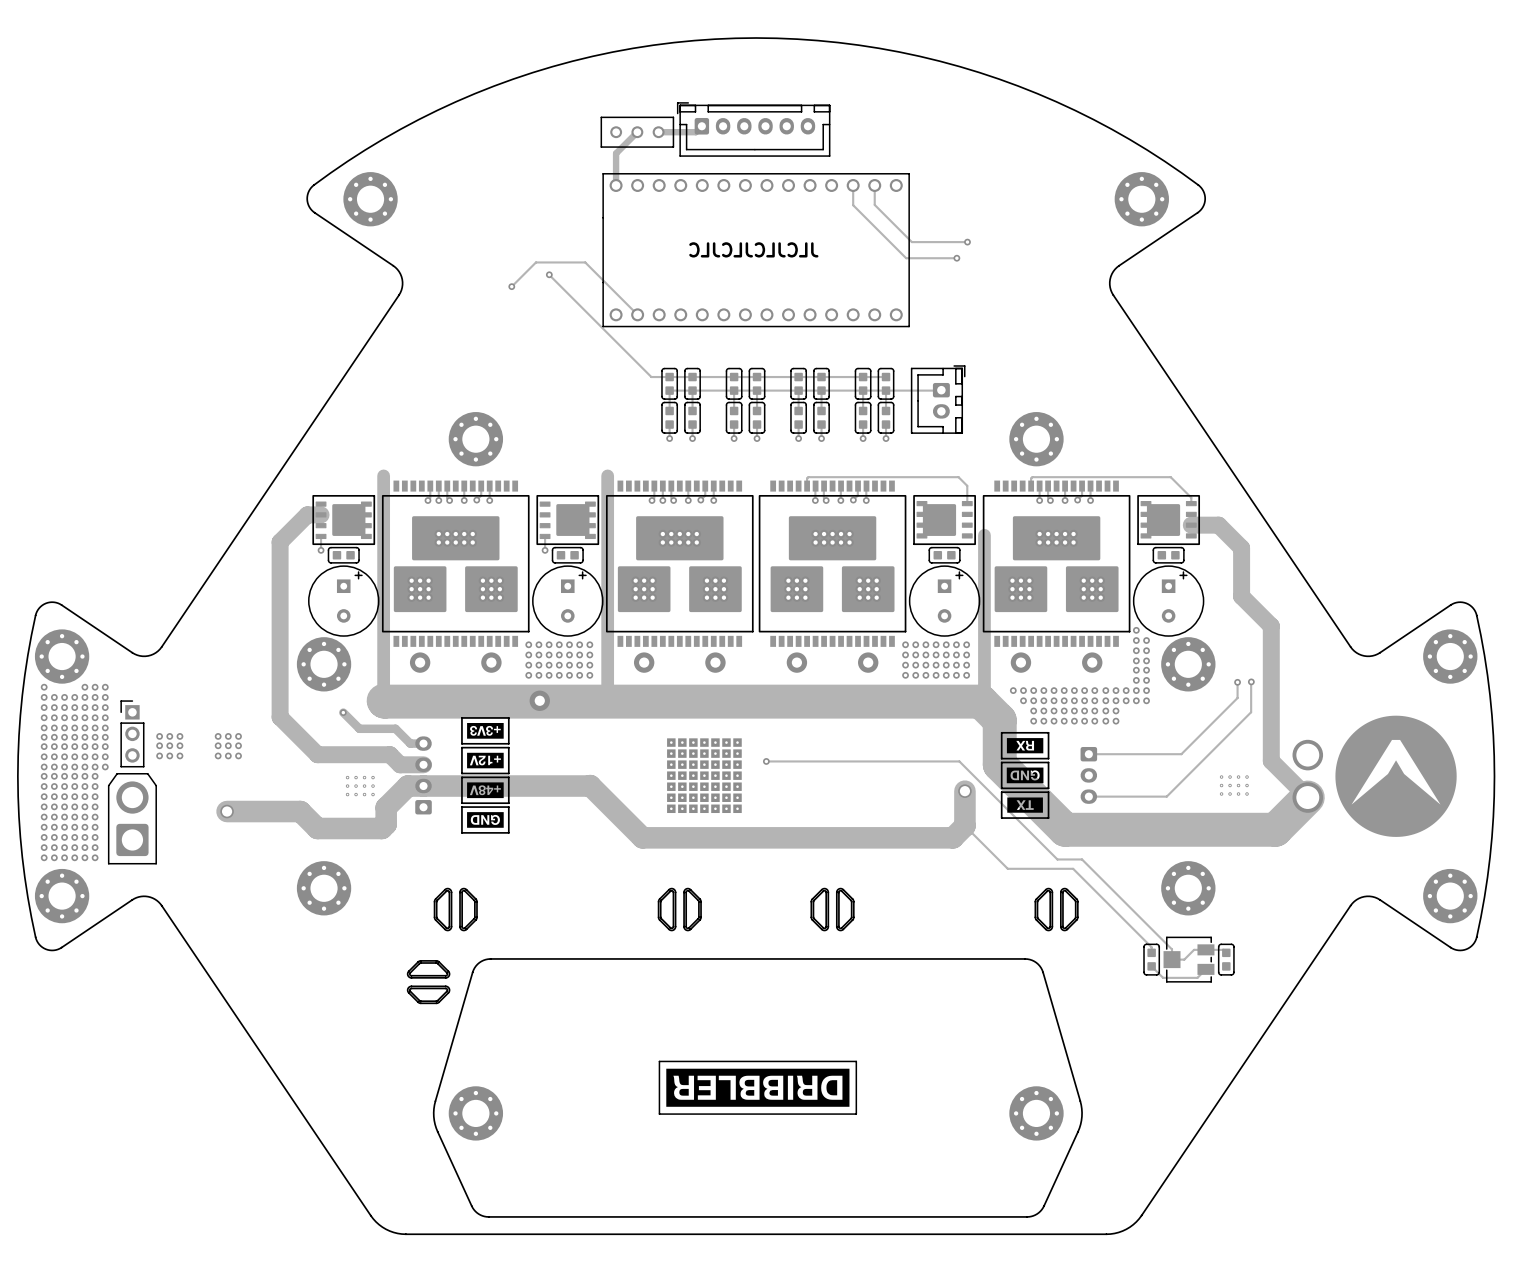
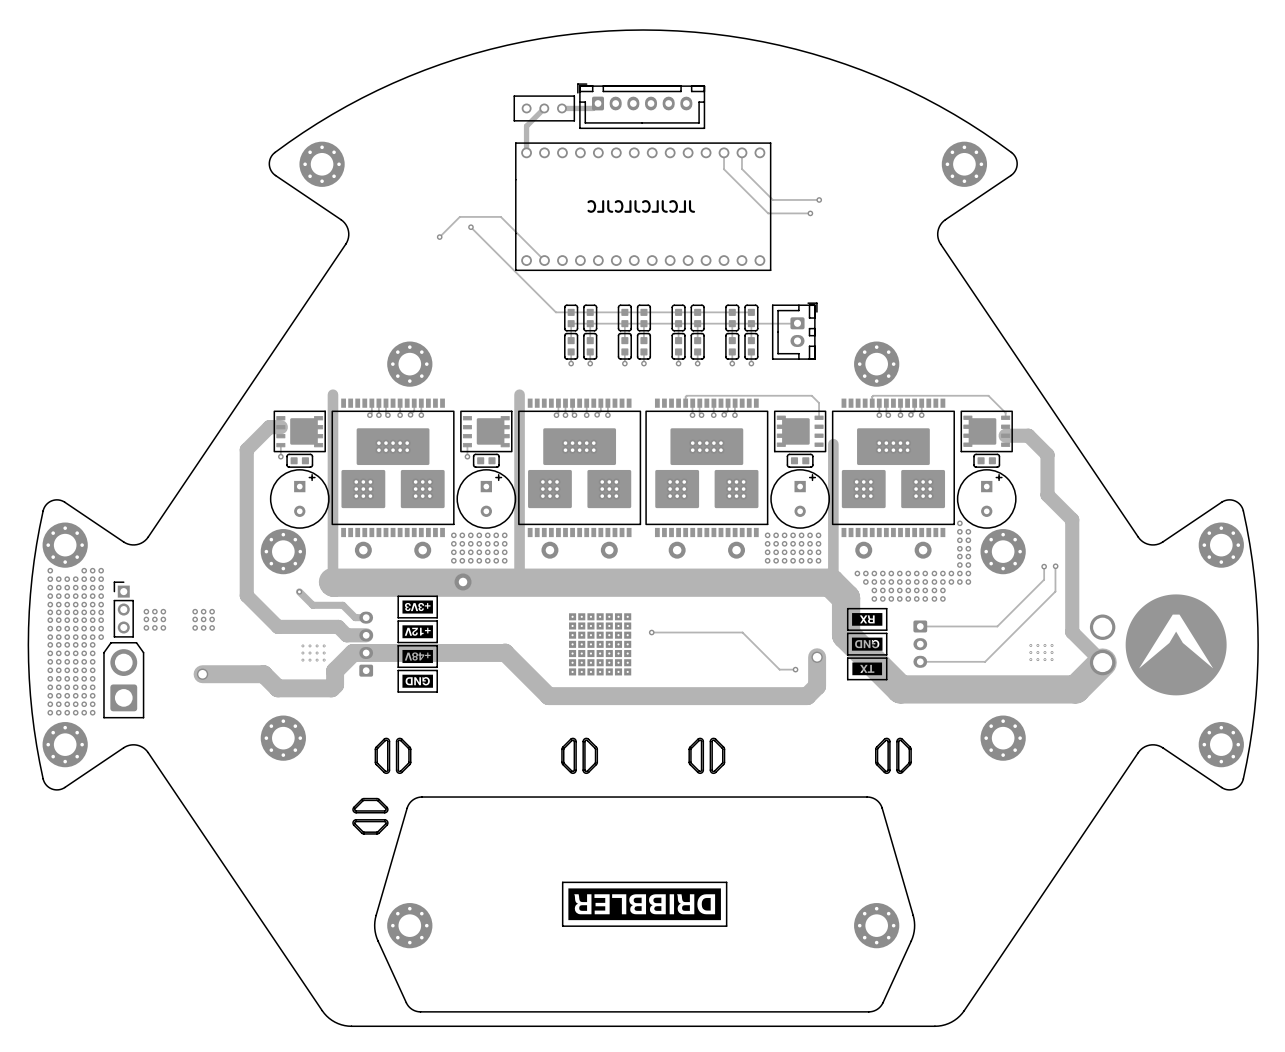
track: (875, 761) (959, 761) (1057, 859) (1082, 859) (1172, 949) (1172, 959) (1184, 959) (1194, 949) (1223, 949) (1226, 952) -> (742, 632) (779, 669) (795, 669)
via: none -> (795, 669)
track: (964, 825) (1007, 868) (1073, 868) (1151, 947) (1151, 952) -> none
part: (1151, 959) -> none
part: (1188, 959) -> none
part: (1226, 959) -> none
track: (1151, 966) (1163, 977) (1197, 977) (1205, 969) -> none

